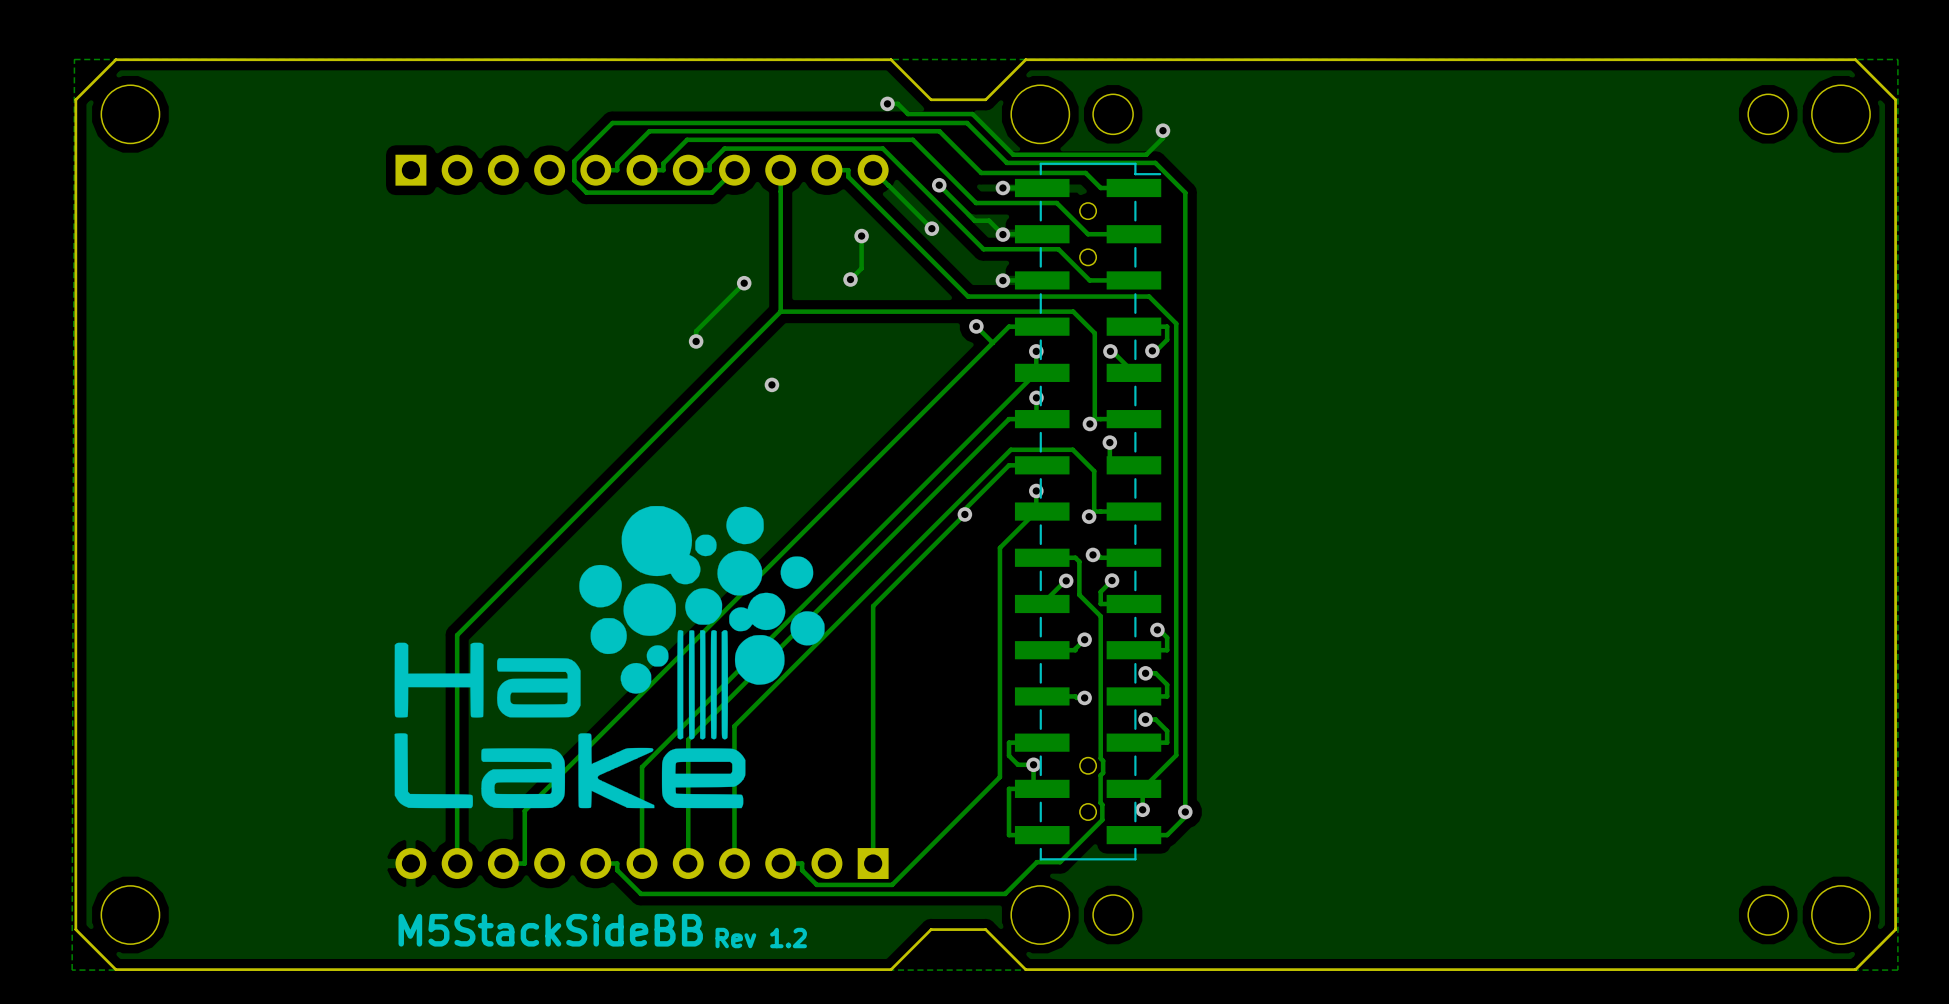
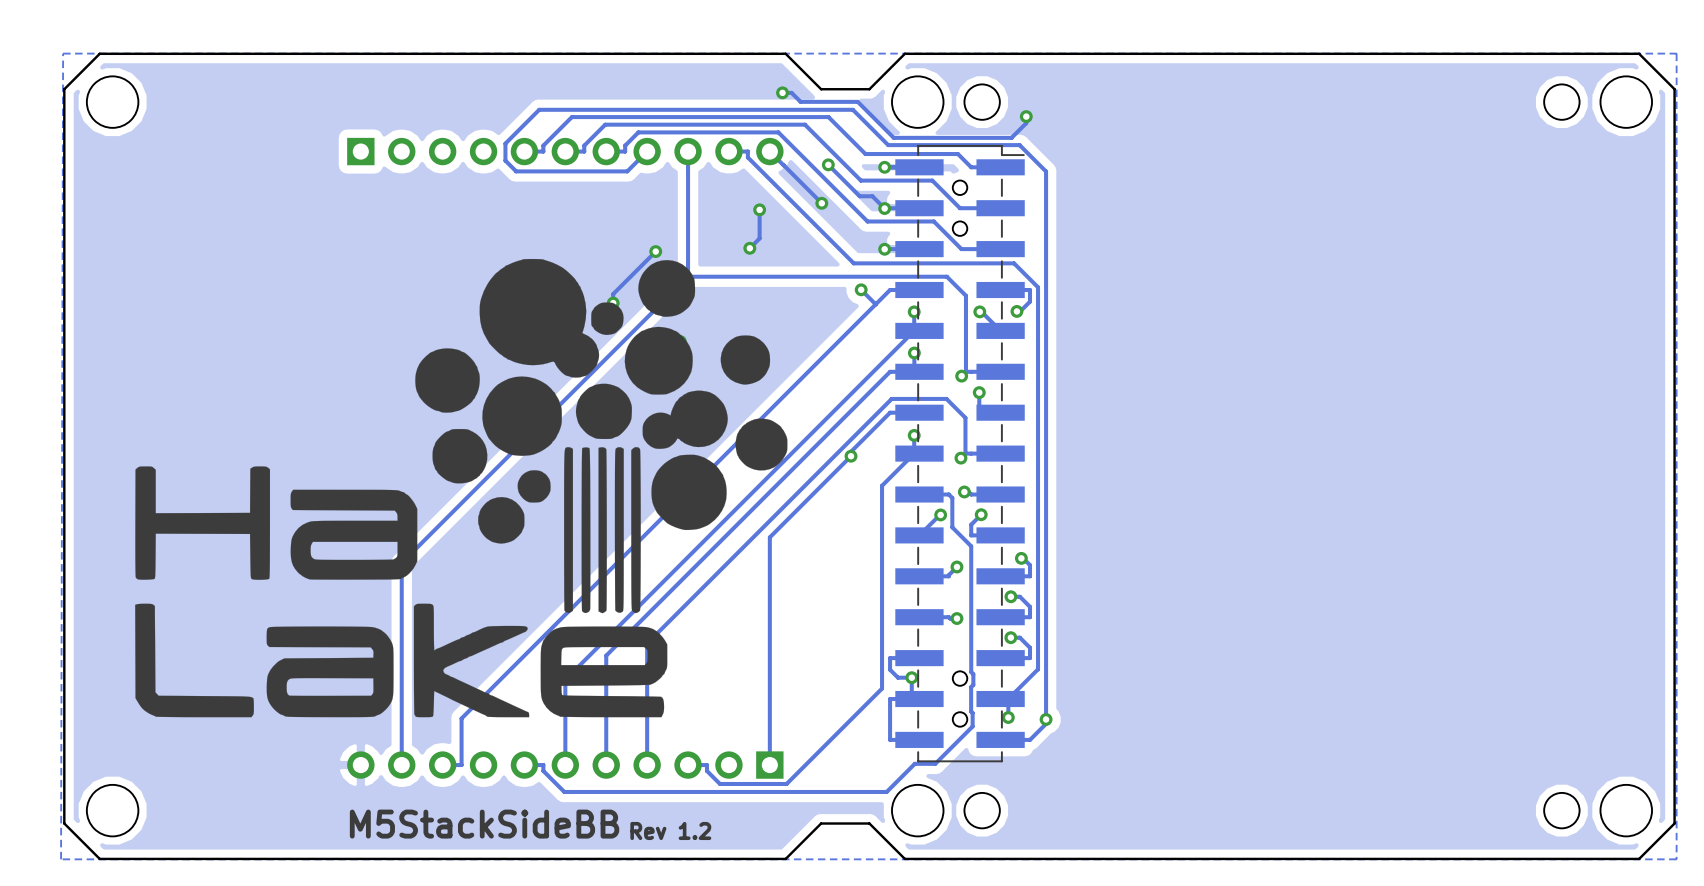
drawing: none -> [135, 258, 788, 718]
drawing: [394, 506, 825, 809] -> none

